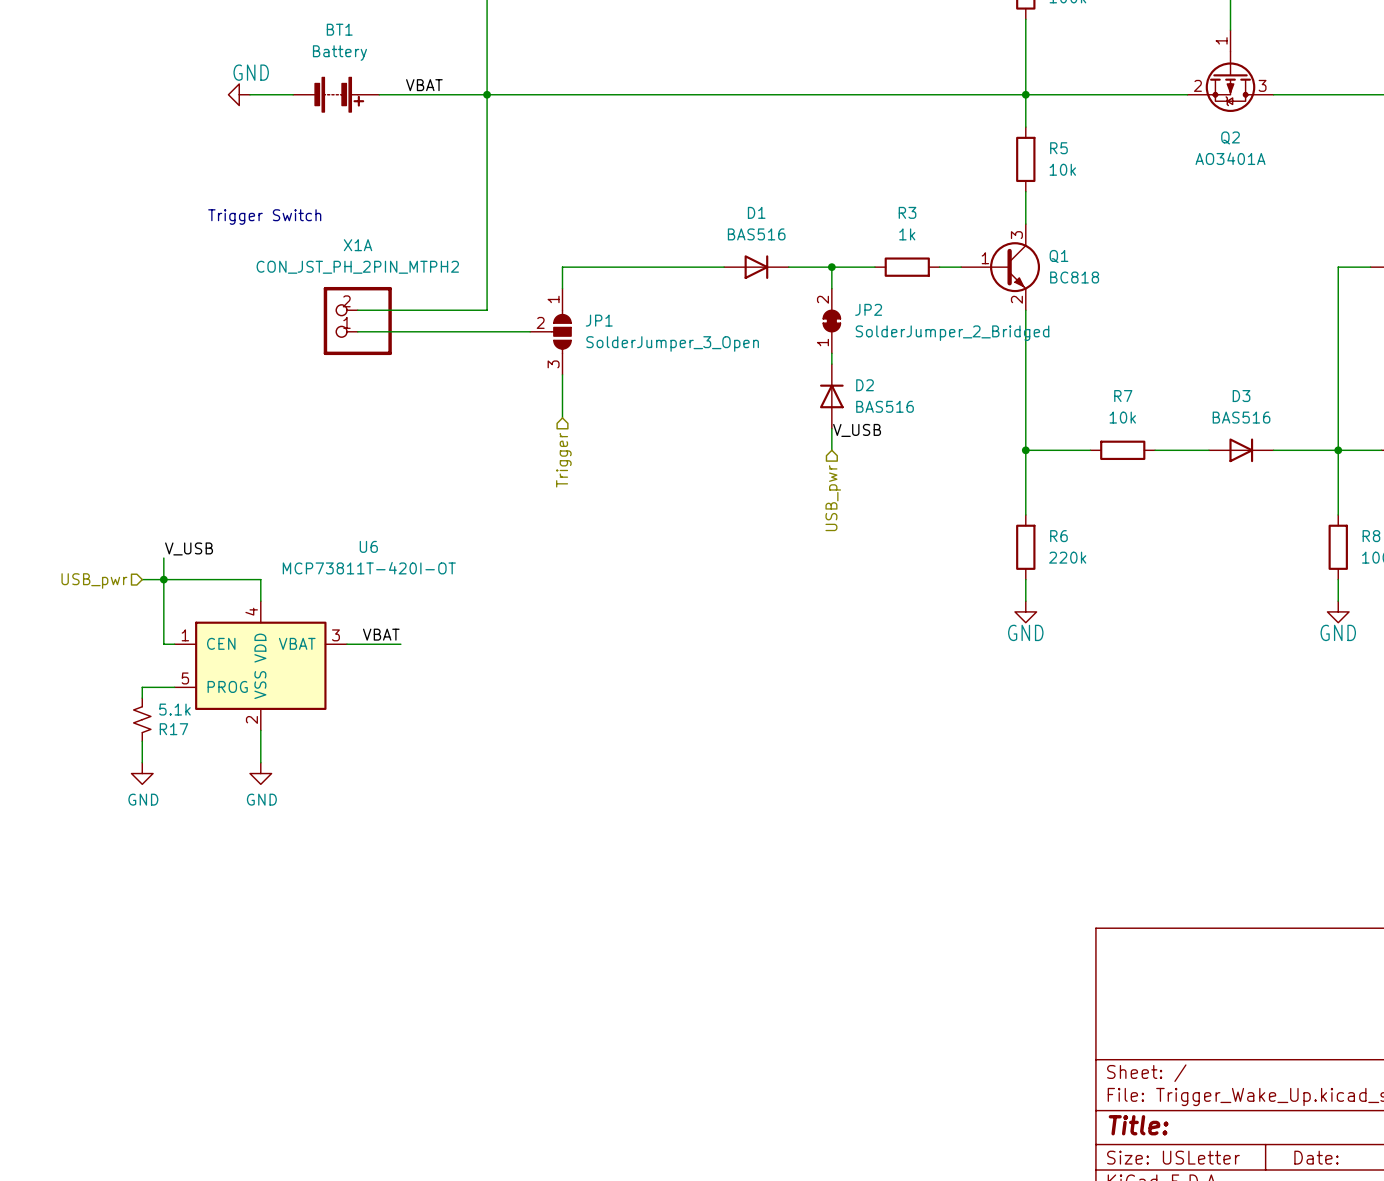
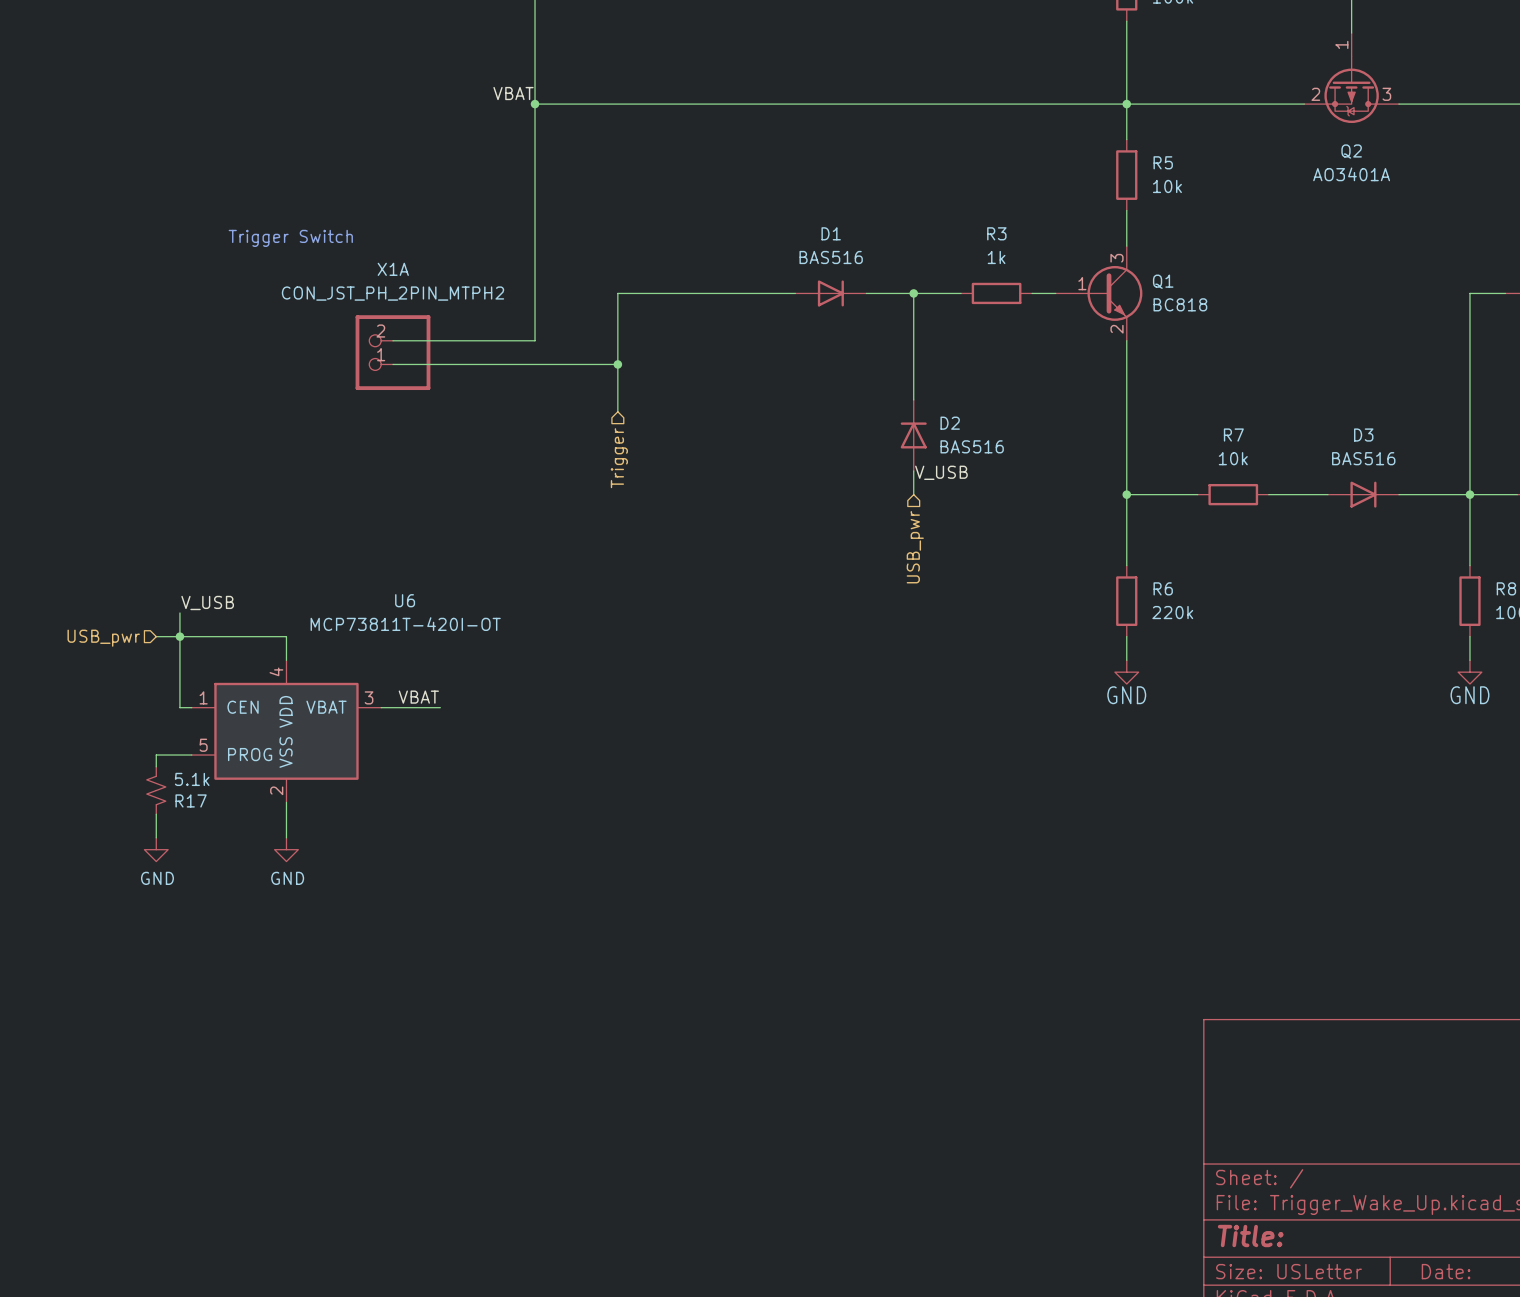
label position: VBAT (424, 85) -> VBAT (513, 93)
power symbol: GND (239, 94) -> none
wire: (250, 94) (293, 94) -> none
BT1: Battery (336, 94) -> none
wire: (379, 94) (487, 94) -> none
JP2: SolderJumper_2_Bridged (831, 321) -> none
JP1: SolderJumper_3_Open (550, 331) -> none
junction: none -> (617, 364)
hierarchical label position: Trigger (563, 460) -> Trigger (619, 458)

